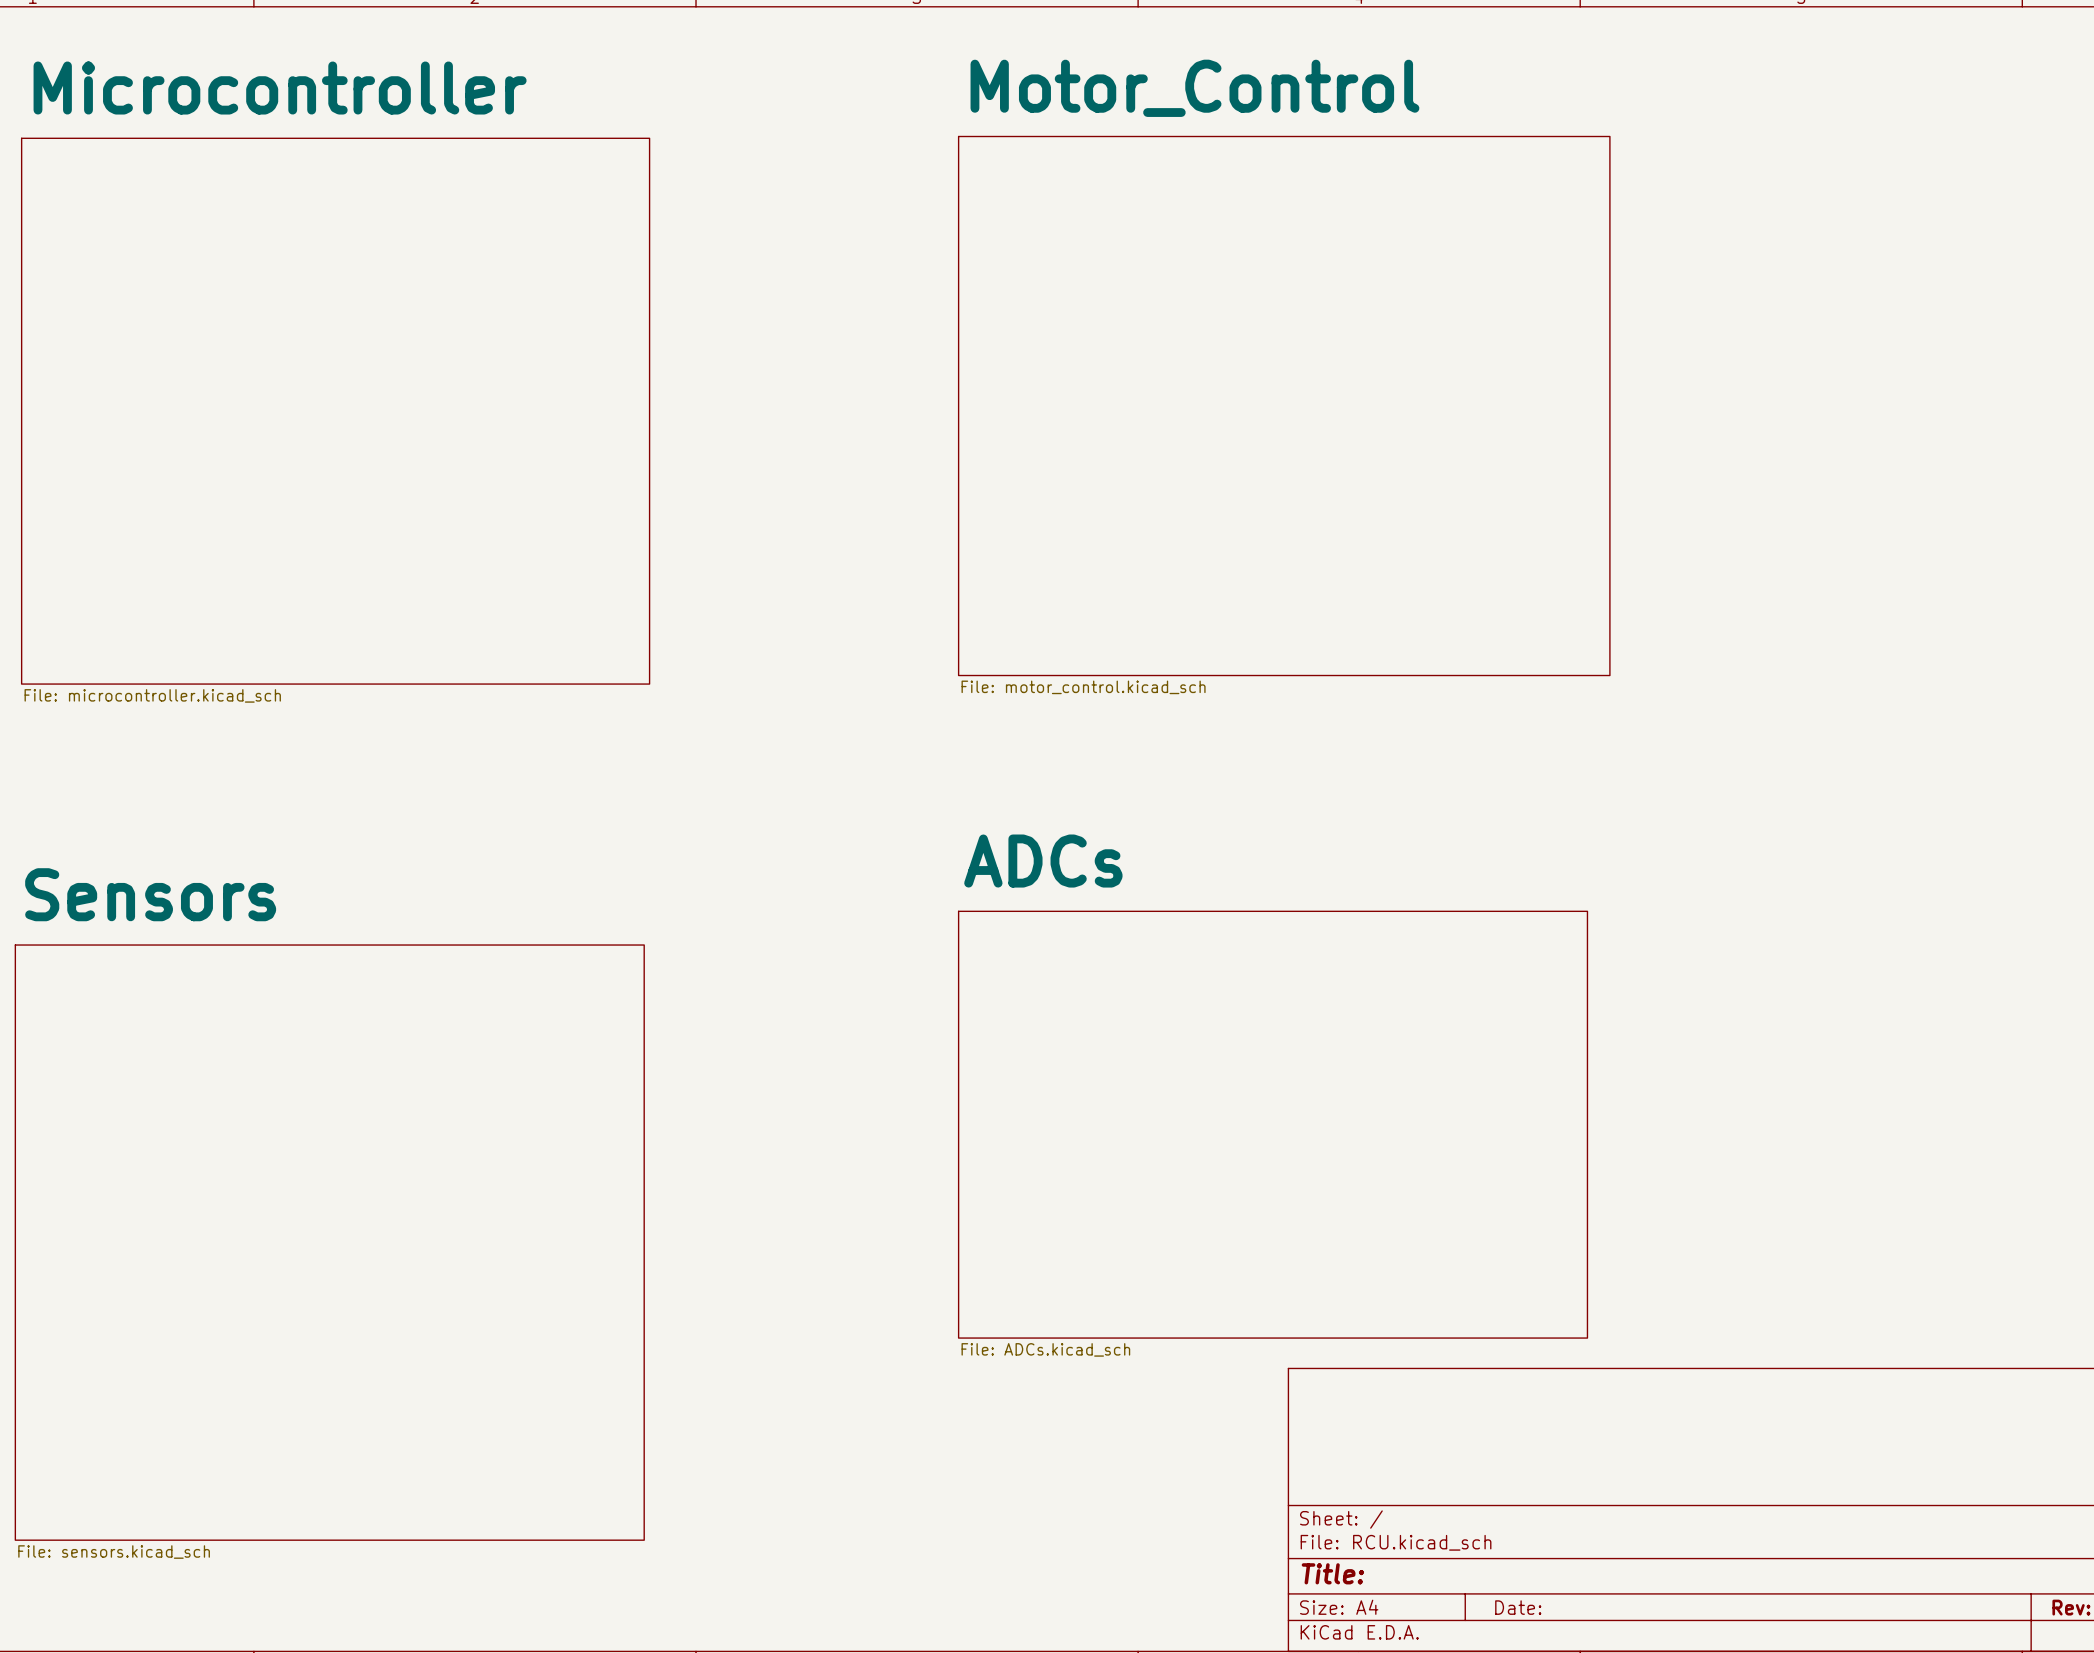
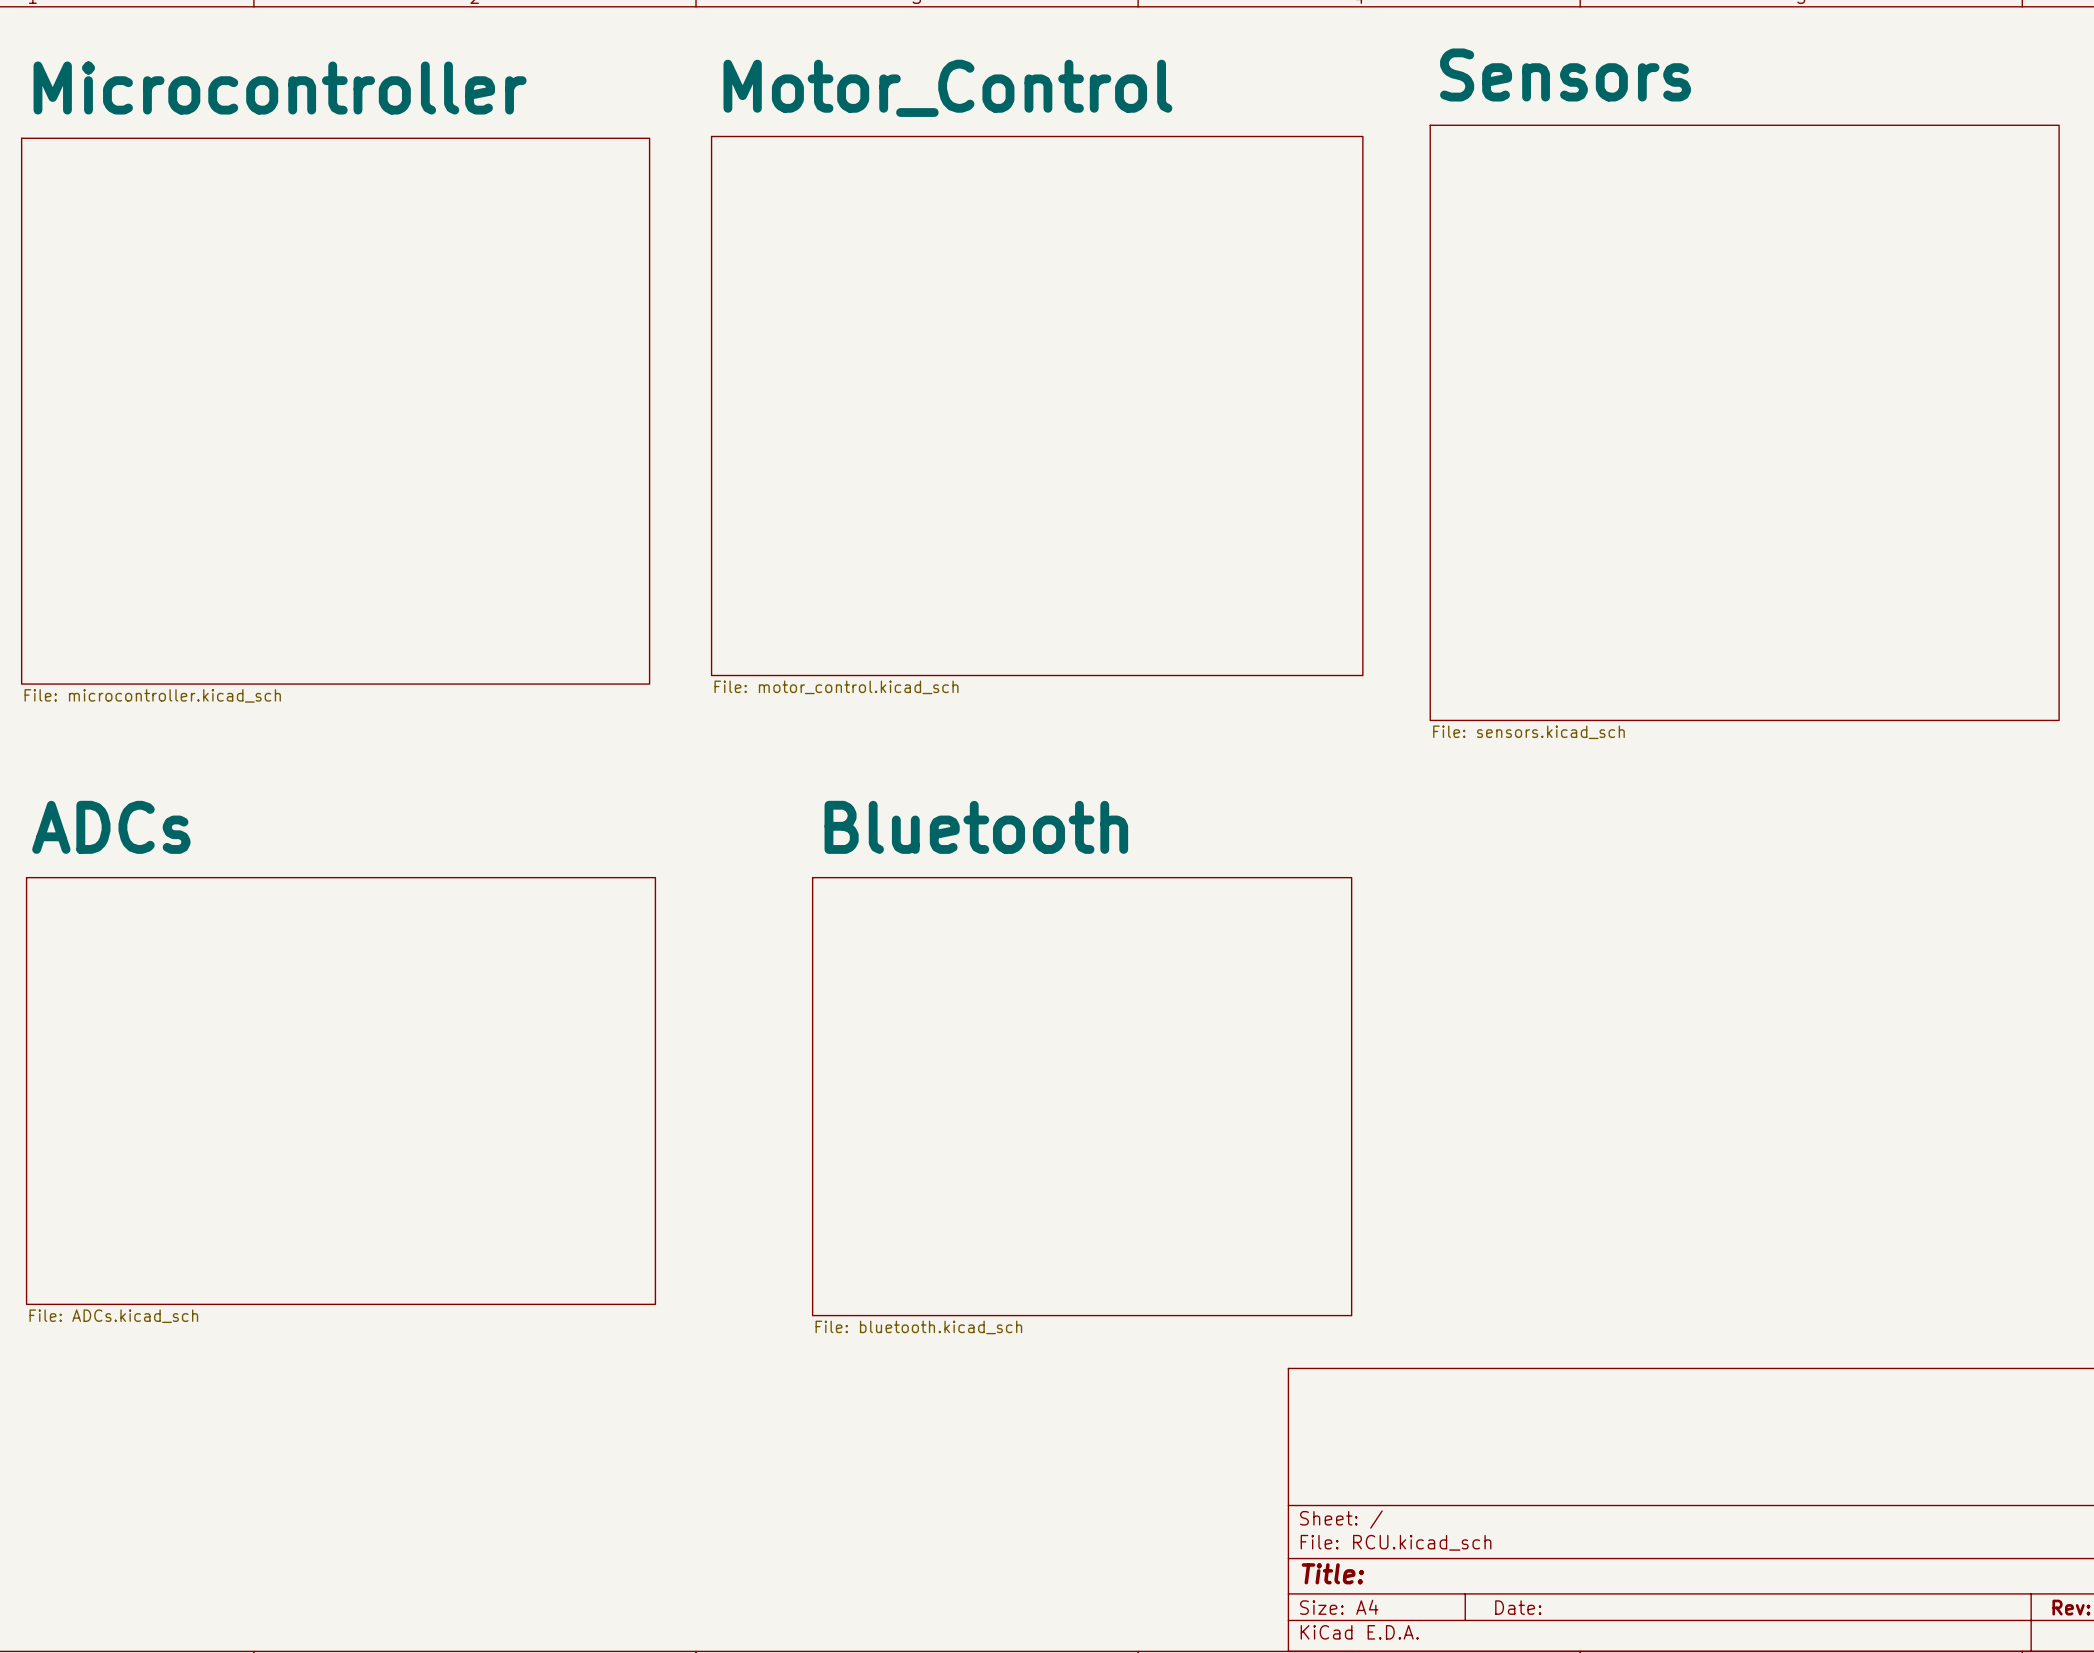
sheet Motor_Control: none -> File: motor_control.kicad_sch (1037, 406)
sheet Motor_Control: File: motor_control.kicad_sch (1284, 406) -> none
sheet Sensors: none -> File: sensors.kicad_sch (1744, 422)
sheet ADCs: none -> File: ADCs.kicad_sch (341, 1091)
sheet Bluetooth: none -> File: bluetooth.kicad_sch (1082, 1096)
sheet ADCs: File: ADCs.kicad_sch (1273, 1124) -> none
sheet Sensors: File: sensors.kicad_sch (329, 1242) -> none

